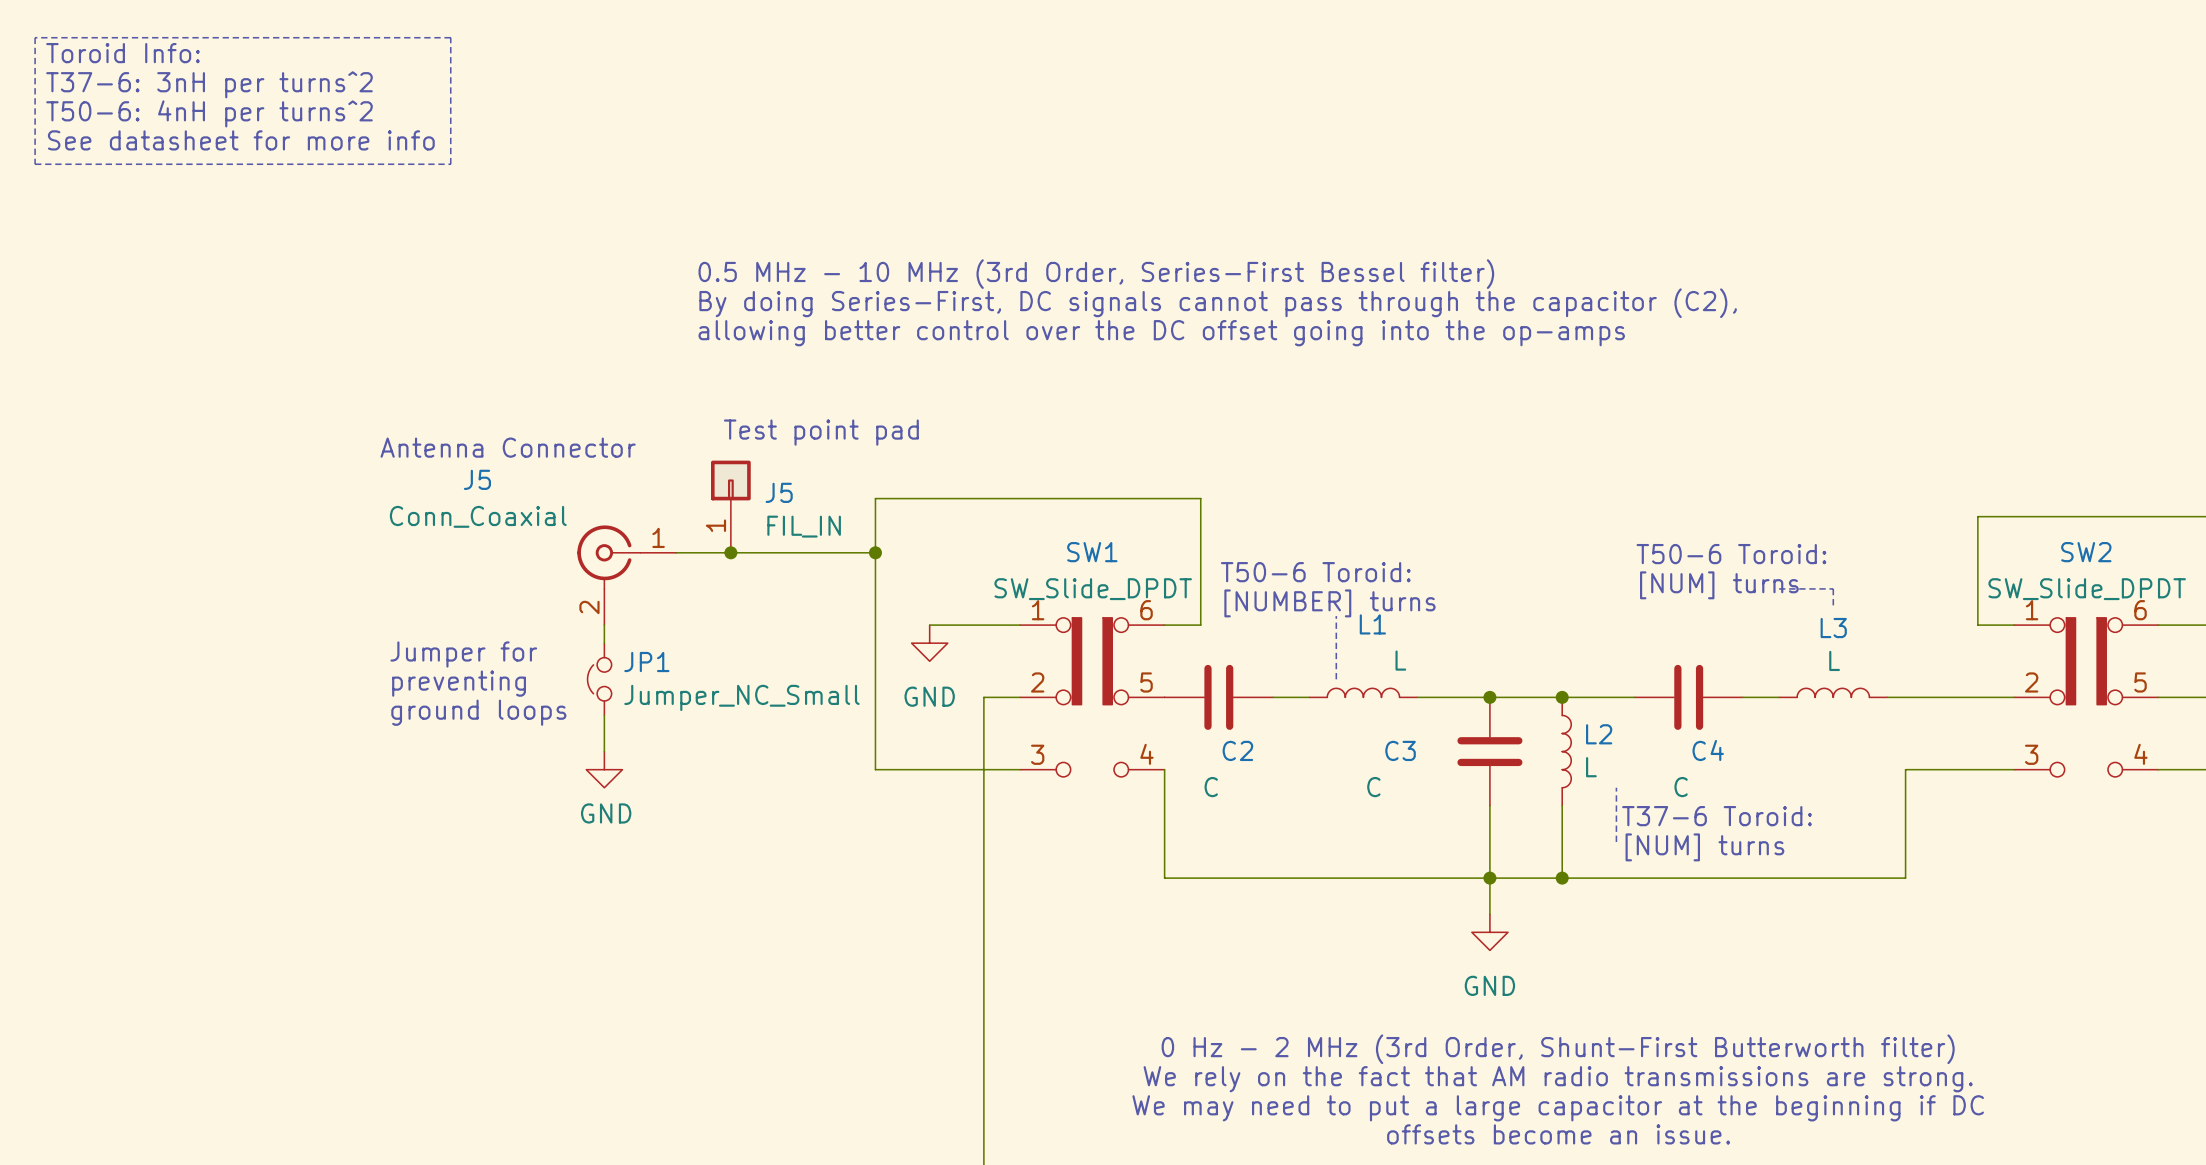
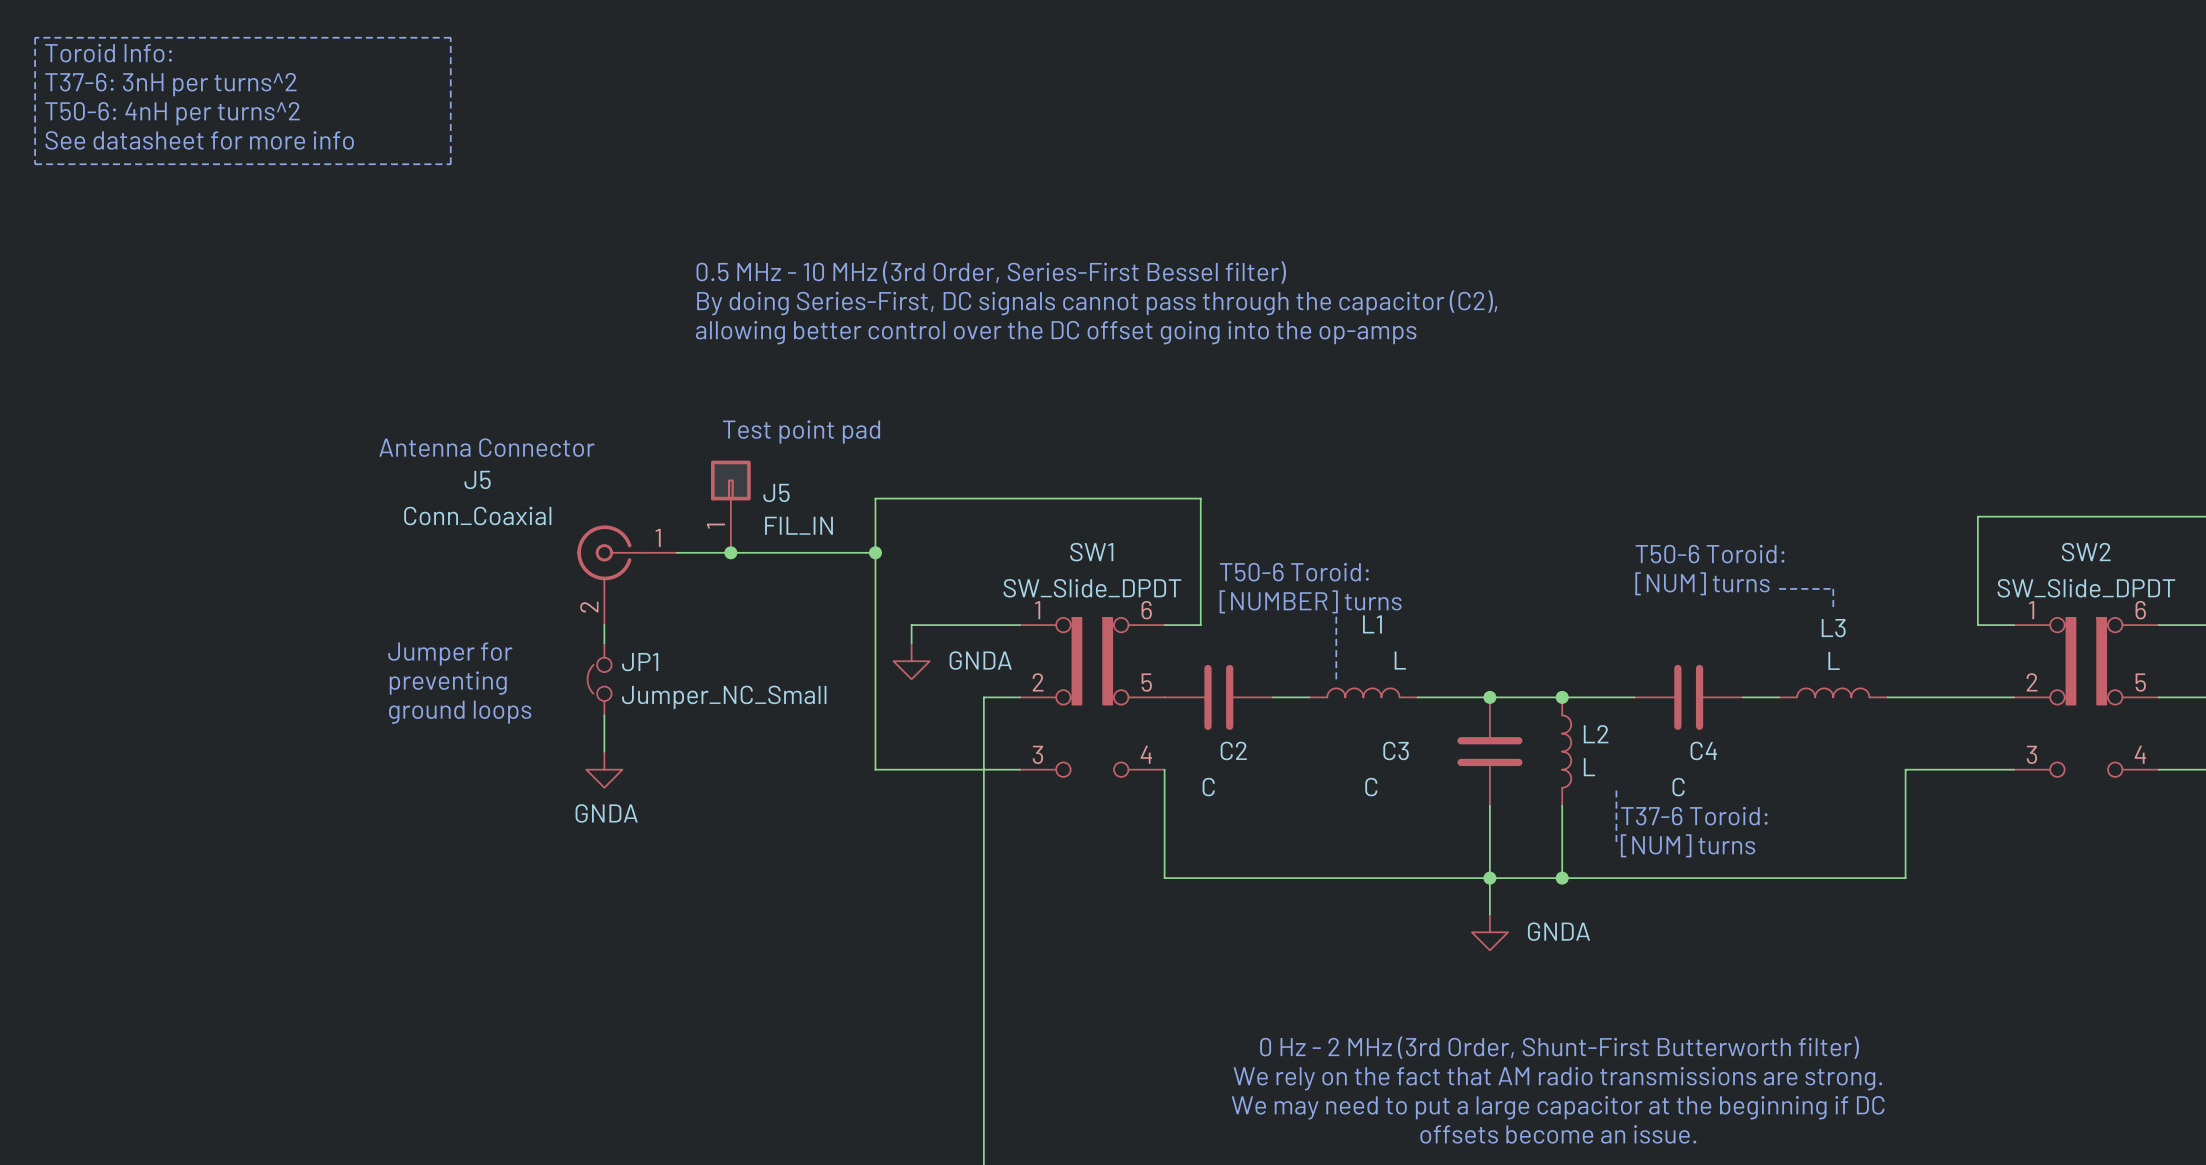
wire: none -> (929, 625) (911, 625) (911, 643)
power symbol: GND (929, 643) -> none
power symbol: none -> GNDA (911, 661)
power symbol: GND (604, 769) -> GNDA (604, 769)
power symbol: GND (1489, 932) -> GNDA (1489, 932)

